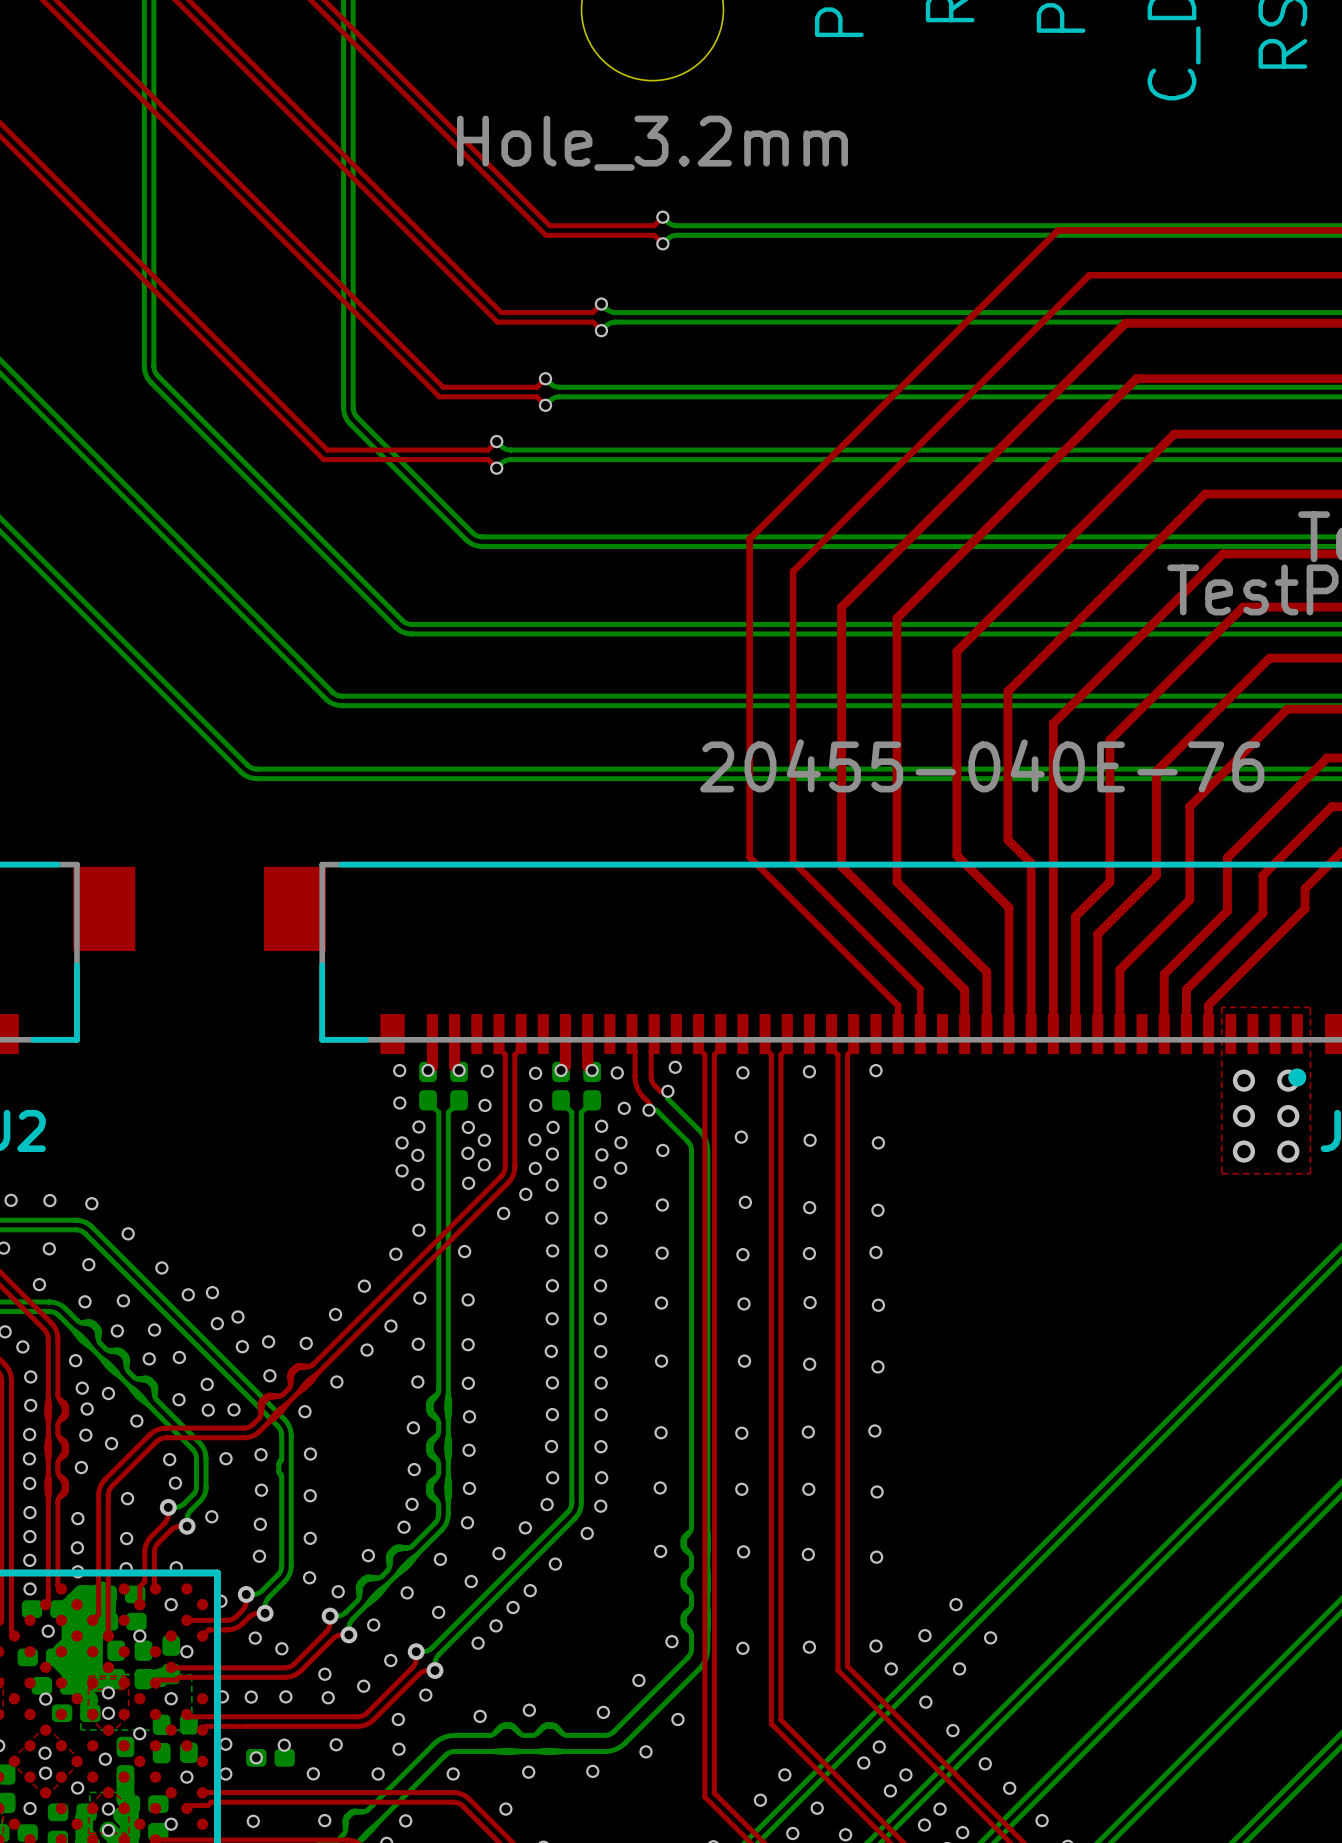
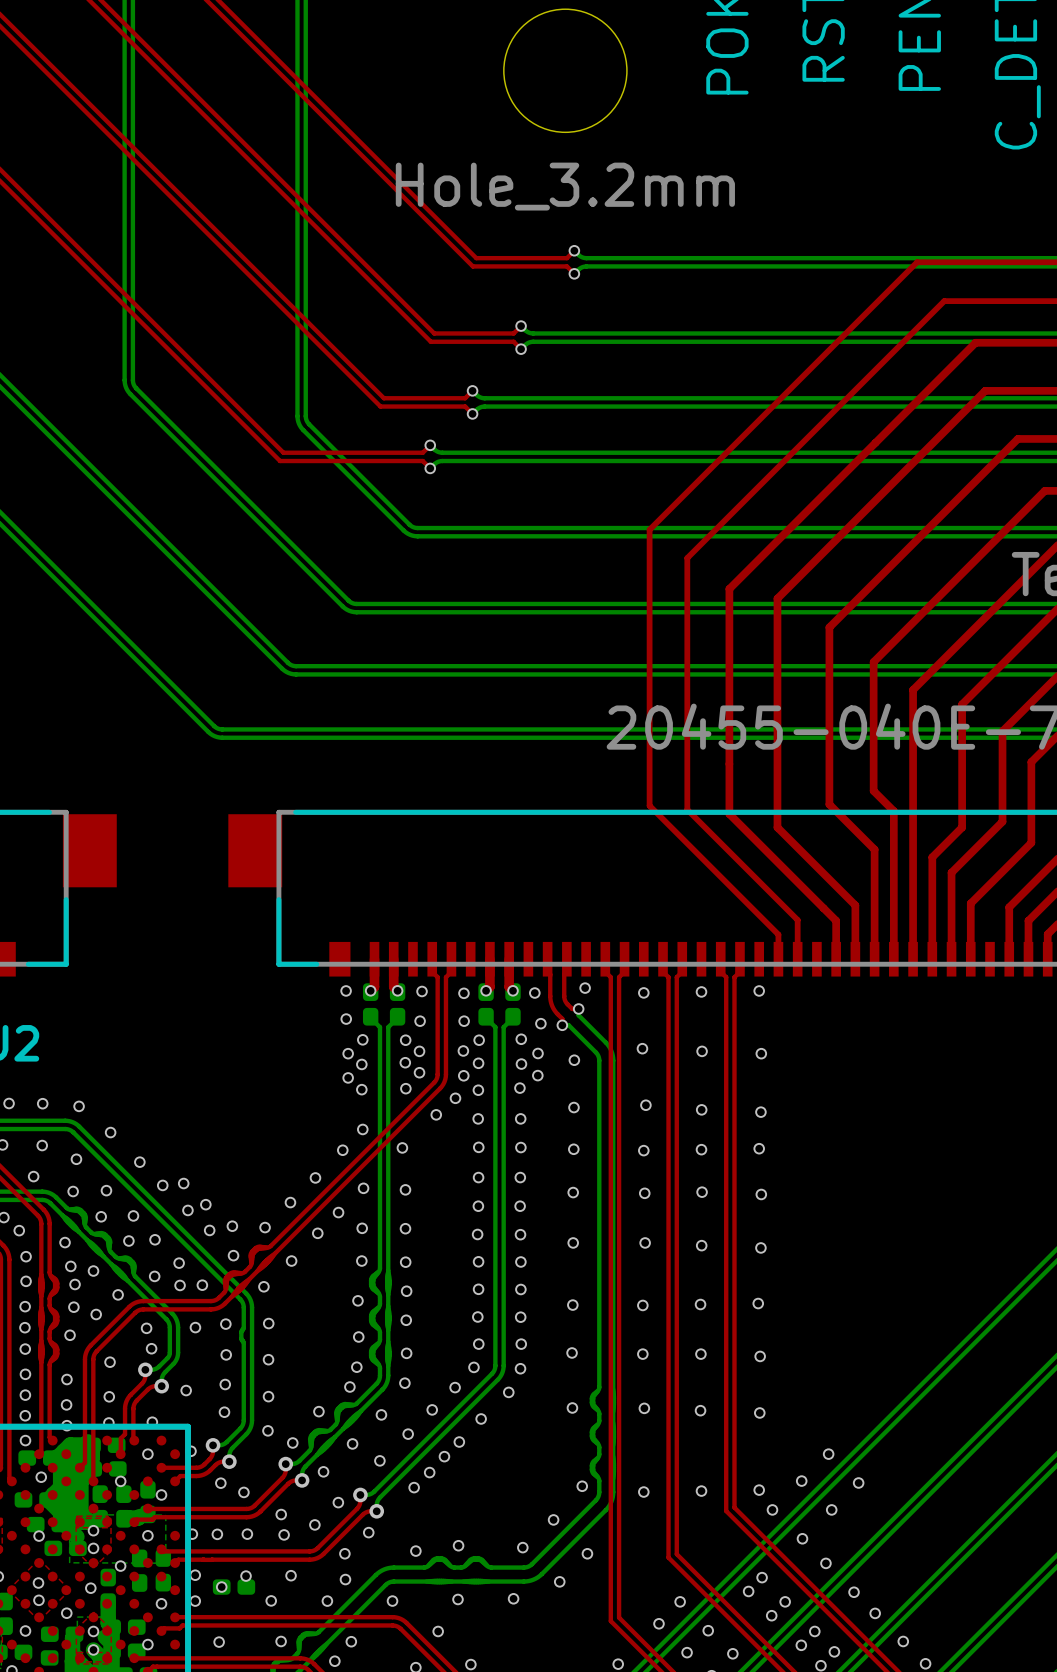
via position: (211, 1516) -> (186, 1390)

